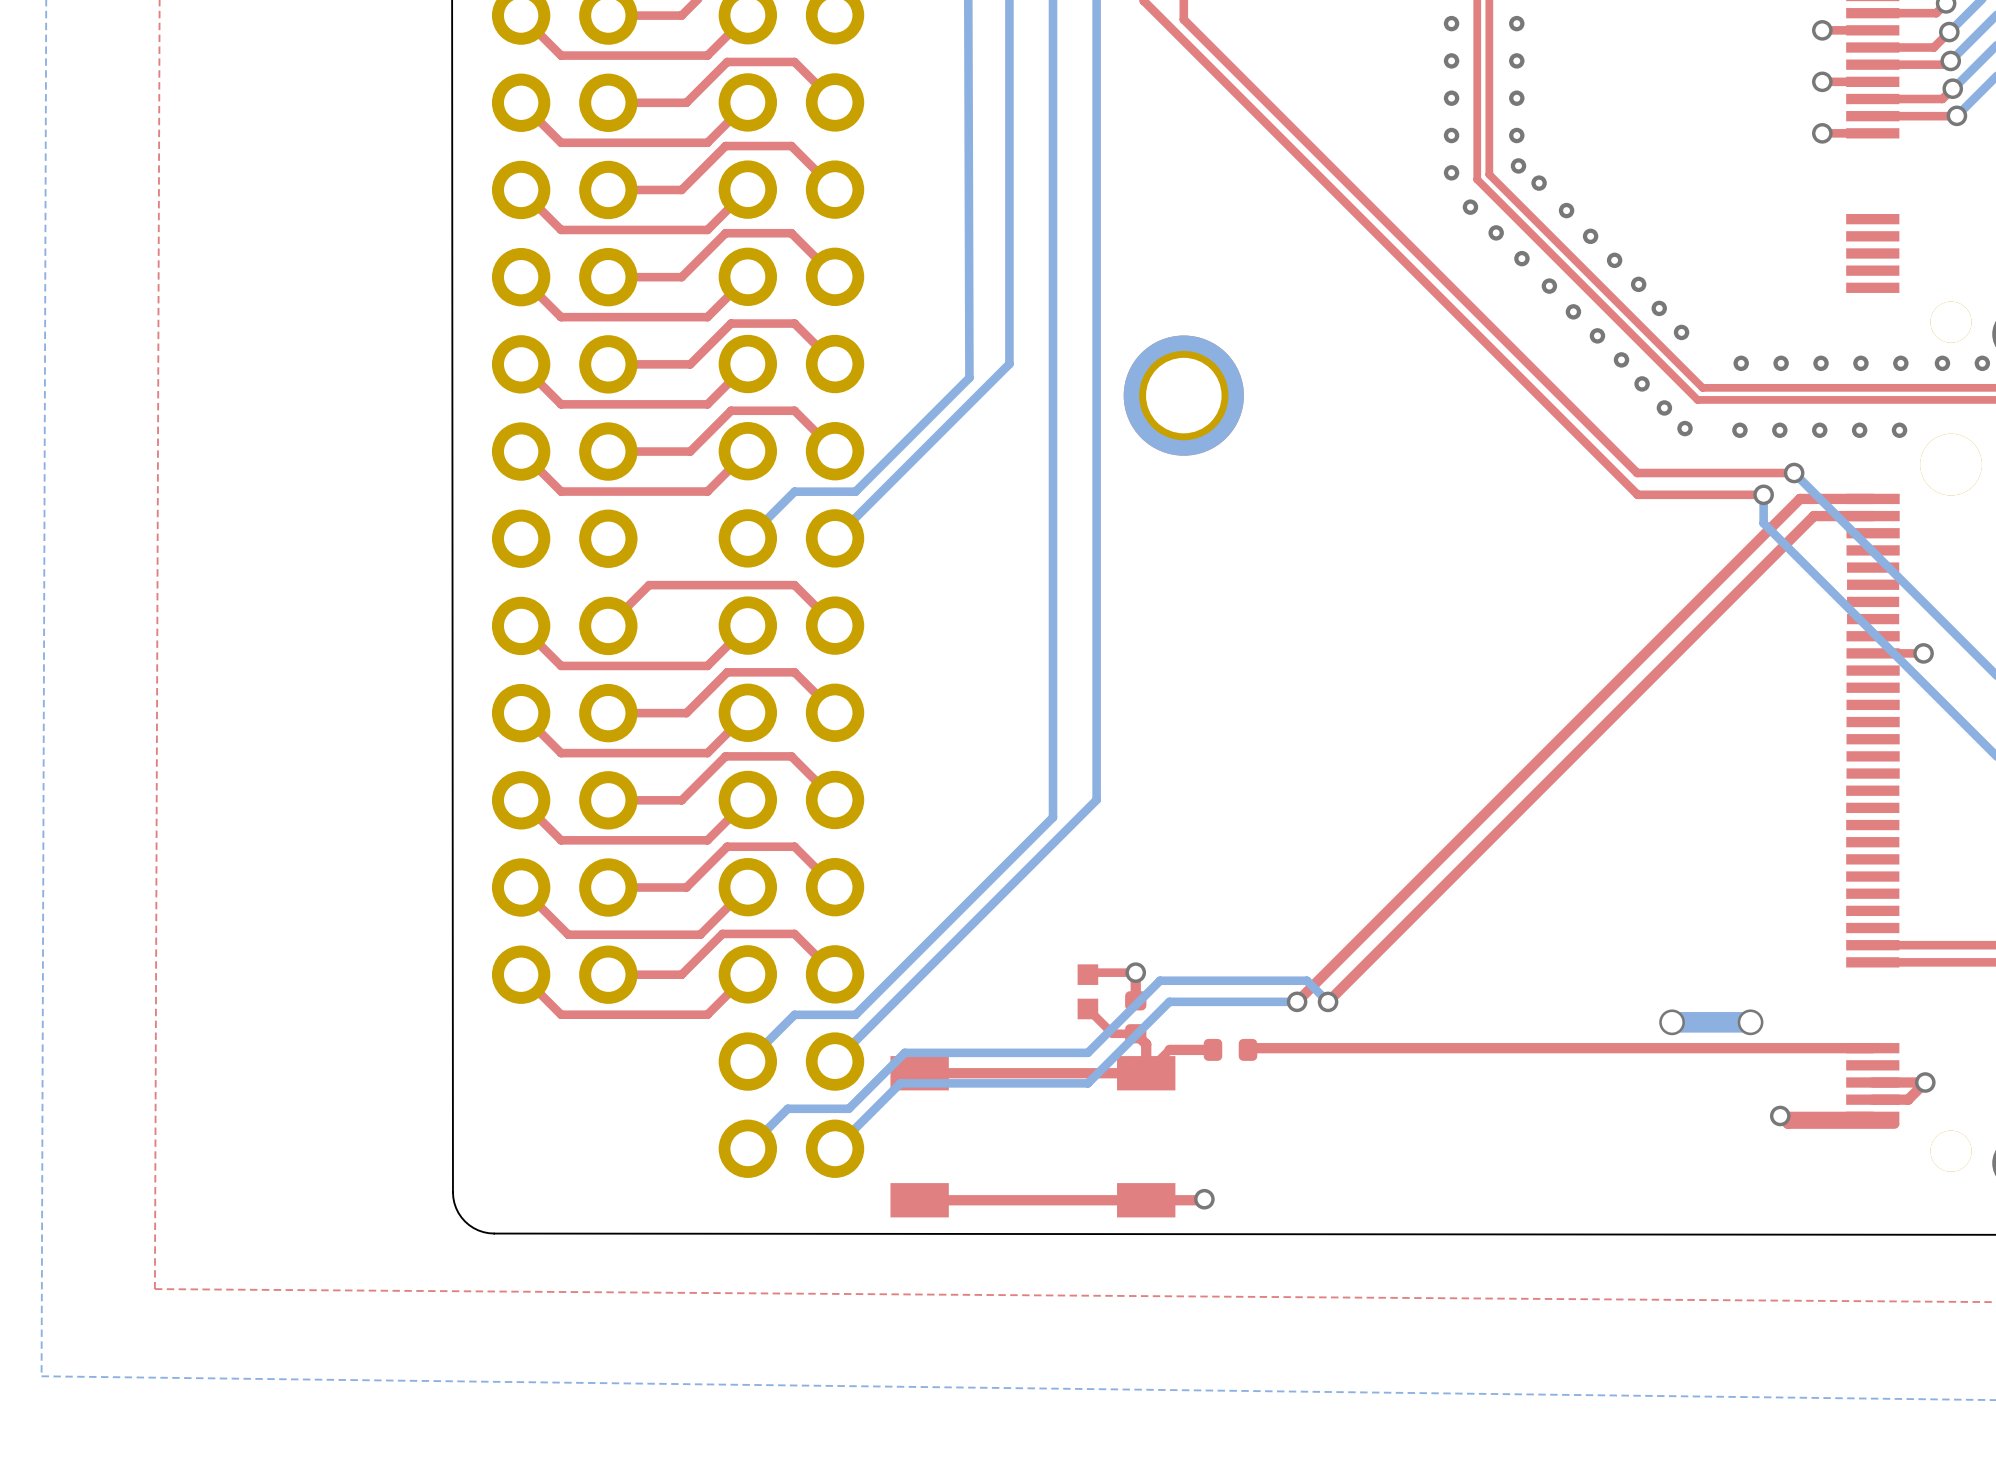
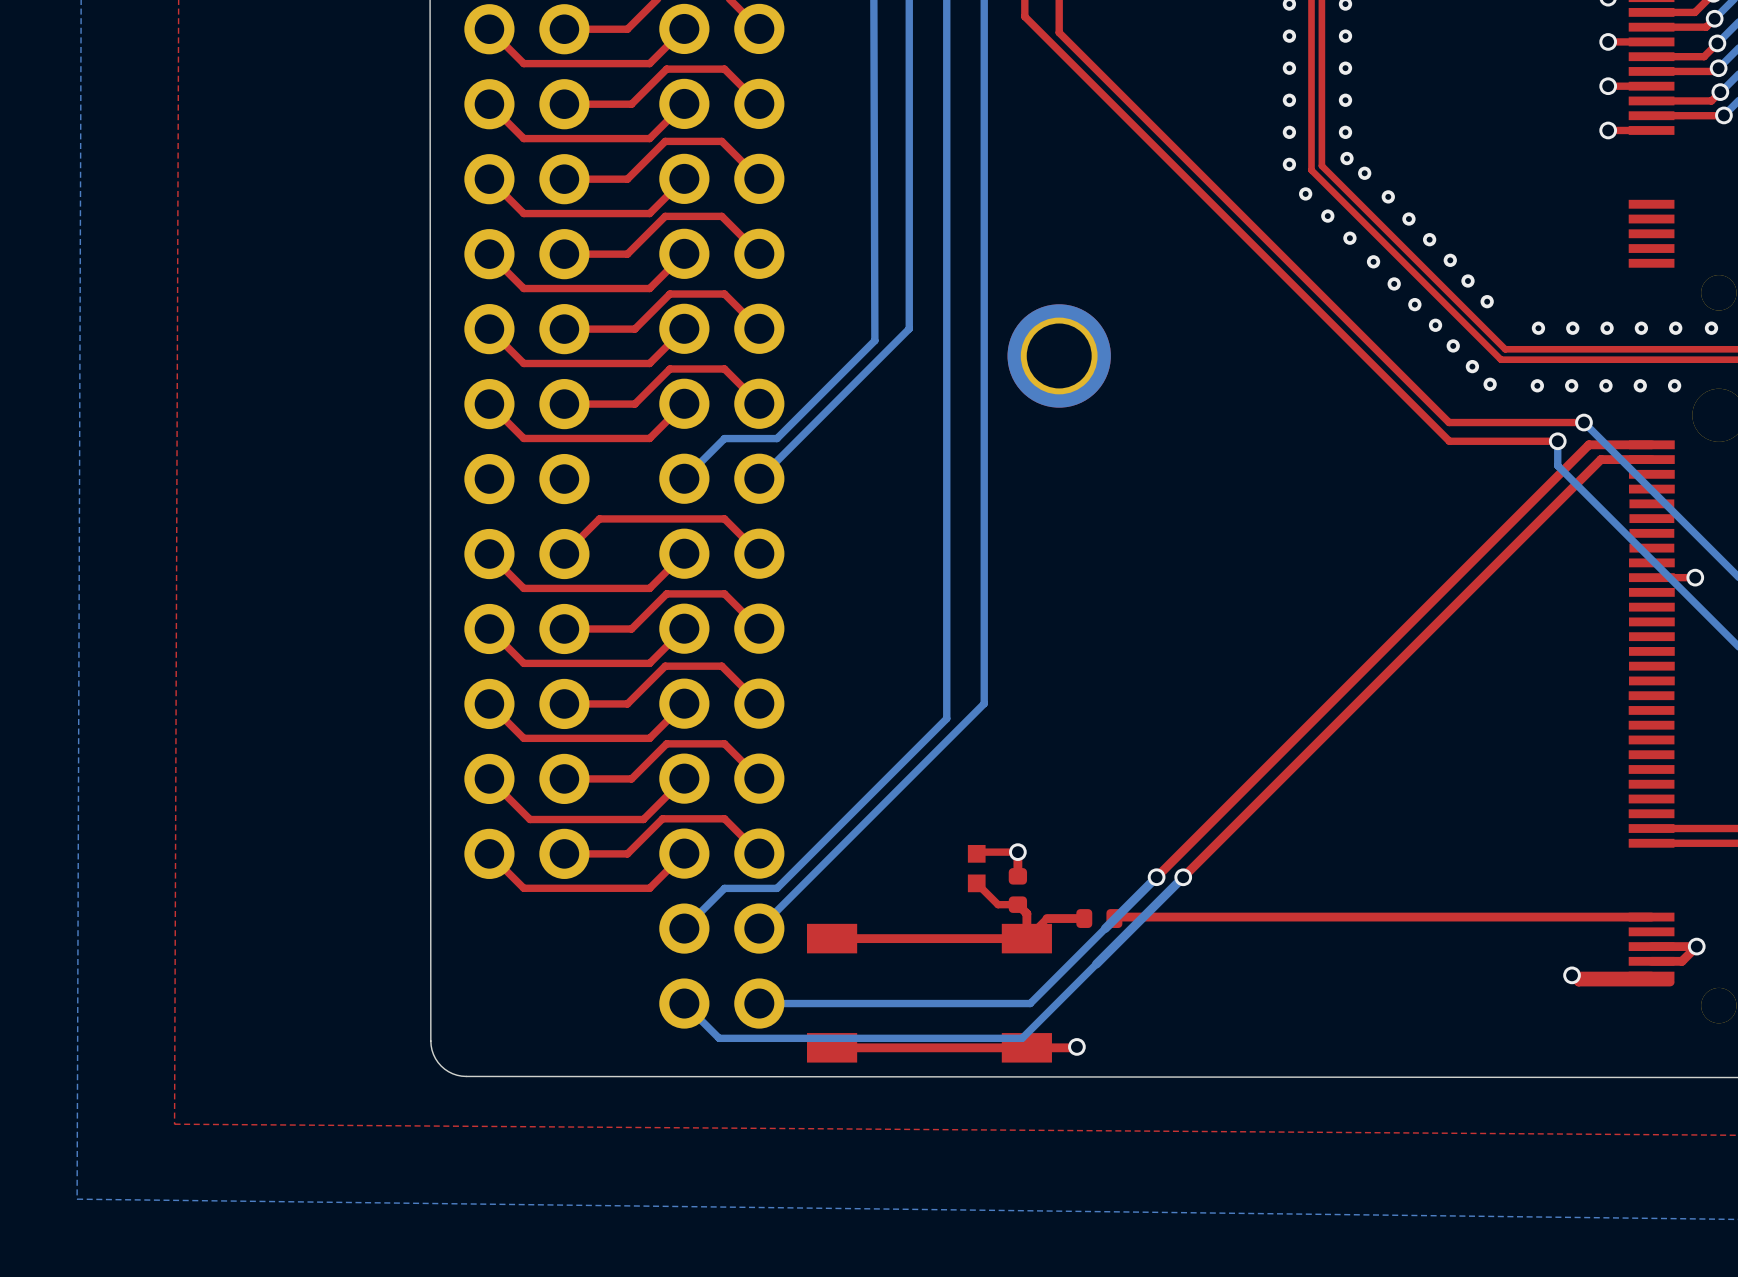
bottom track: (1297, 1001) (1169, 1001) (1087, 1083) (900, 1083) (835, 1148) -> (1156, 877) (1030, 1003) (759, 1003)
bottom track: (1328, 1001) (1306, 980) (1160, 980) (1087, 1052) (904, 1052) (848, 1108) (787, 1108) (747, 1148) -> (1183, 877) (1022, 1038) (719, 1038) (684, 1003)
via: (1672, 1022) -> none
bottom track: (1750, 1022) (1672, 1022) -> none
via: (1750, 1022) -> none

